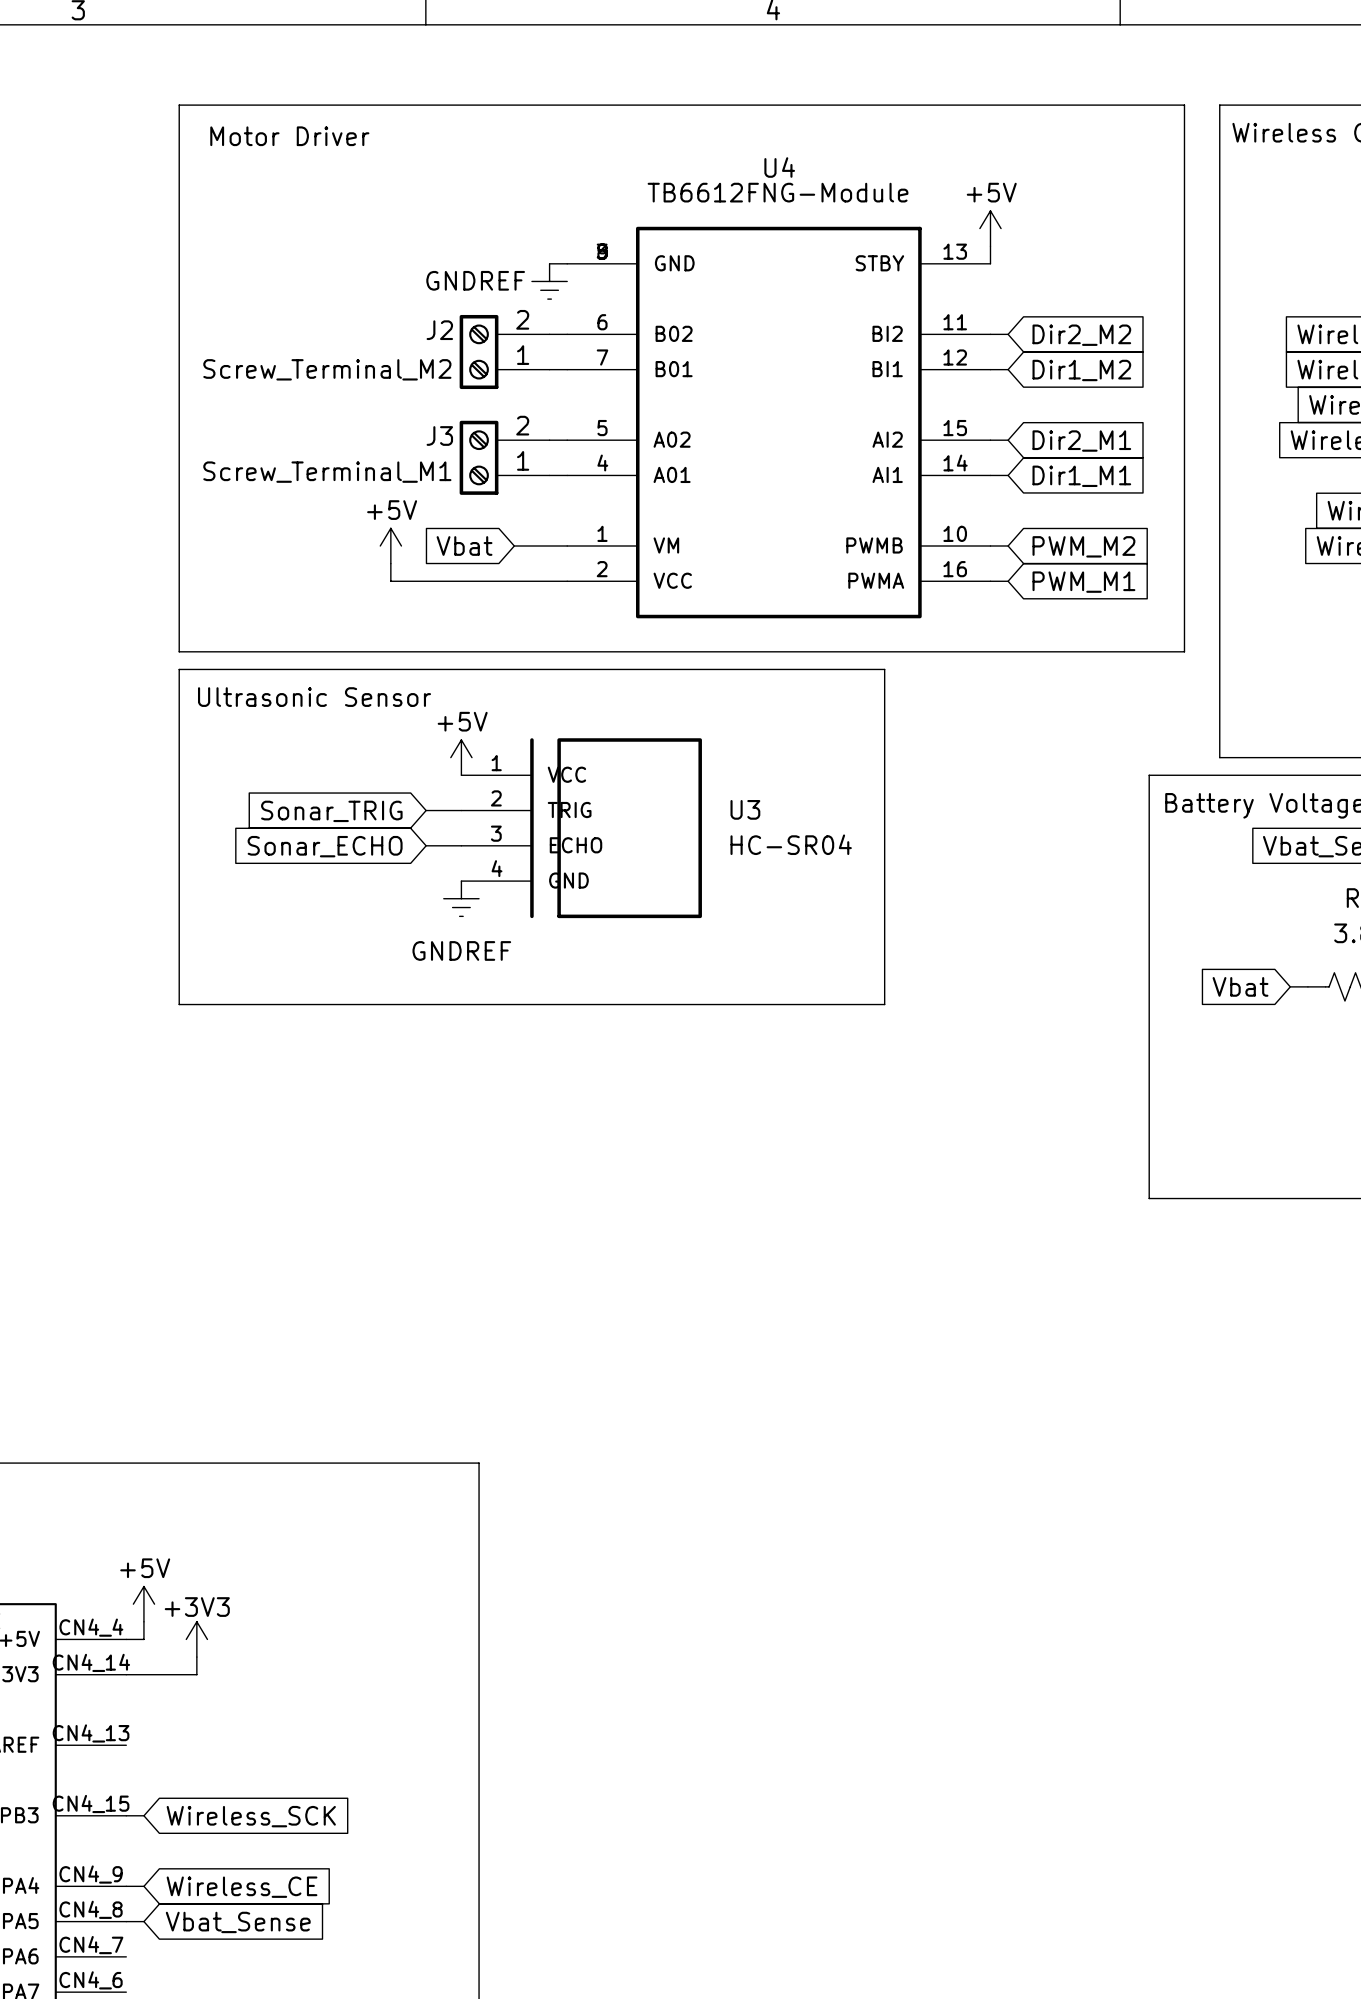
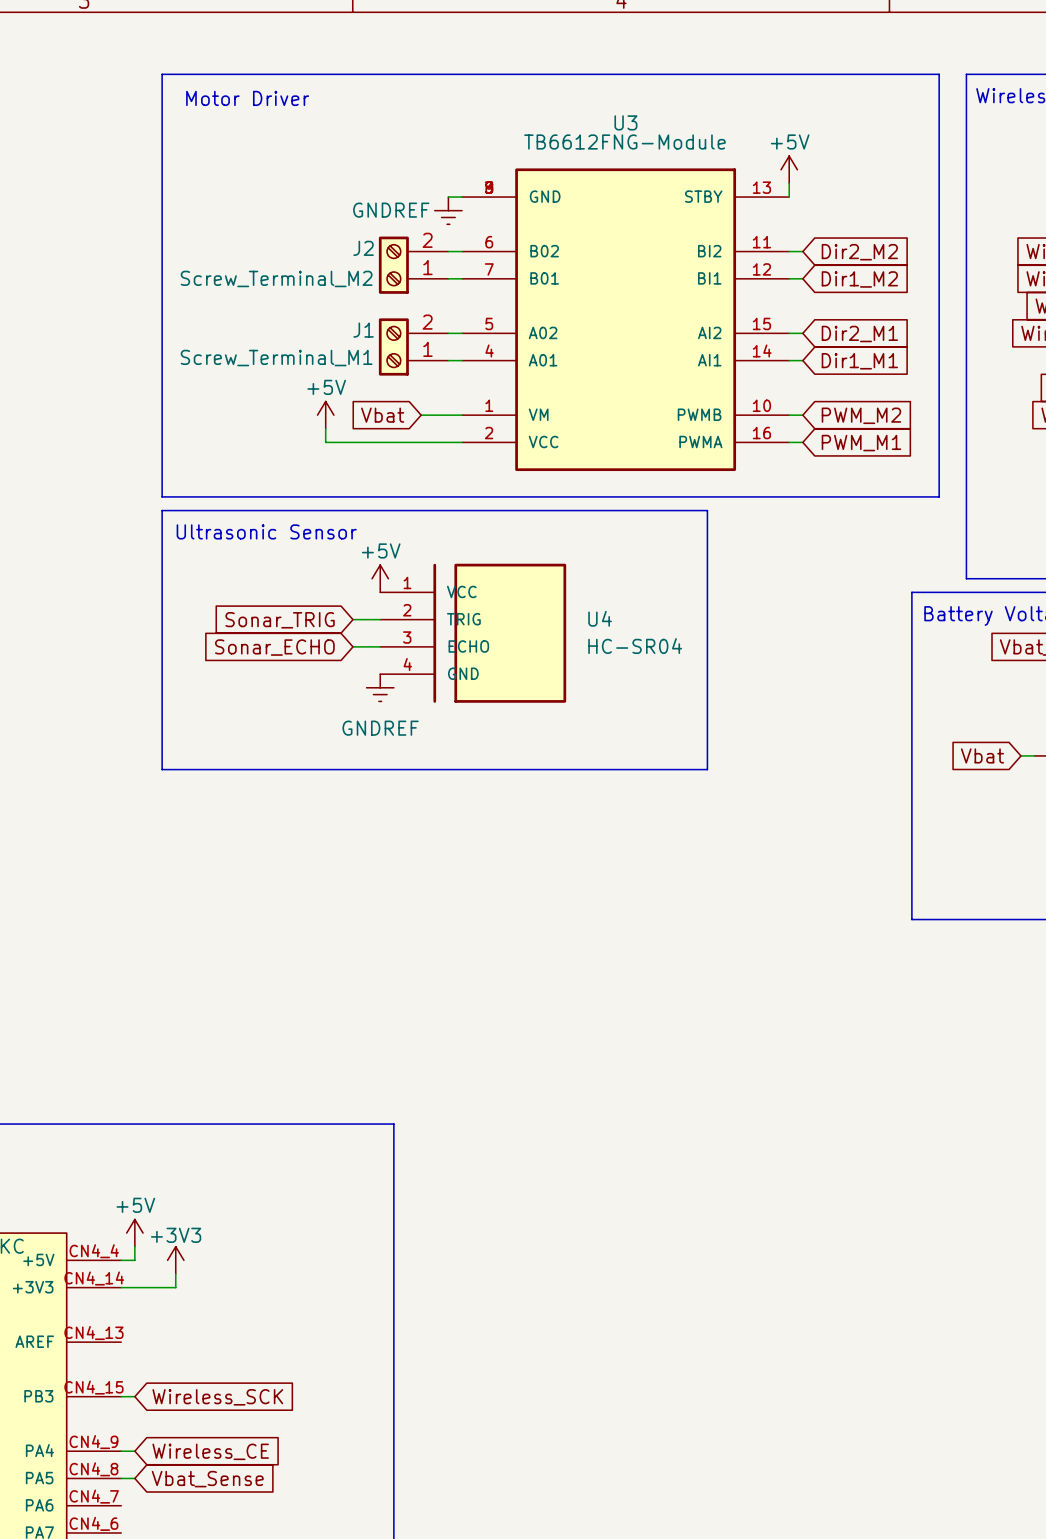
U4 name: U4 (779, 167) -> U3 (625, 122)
J3 name: J3 (439, 435) -> J1 (363, 330)
U3 name: U3 (745, 809) -> U4 (600, 618)

